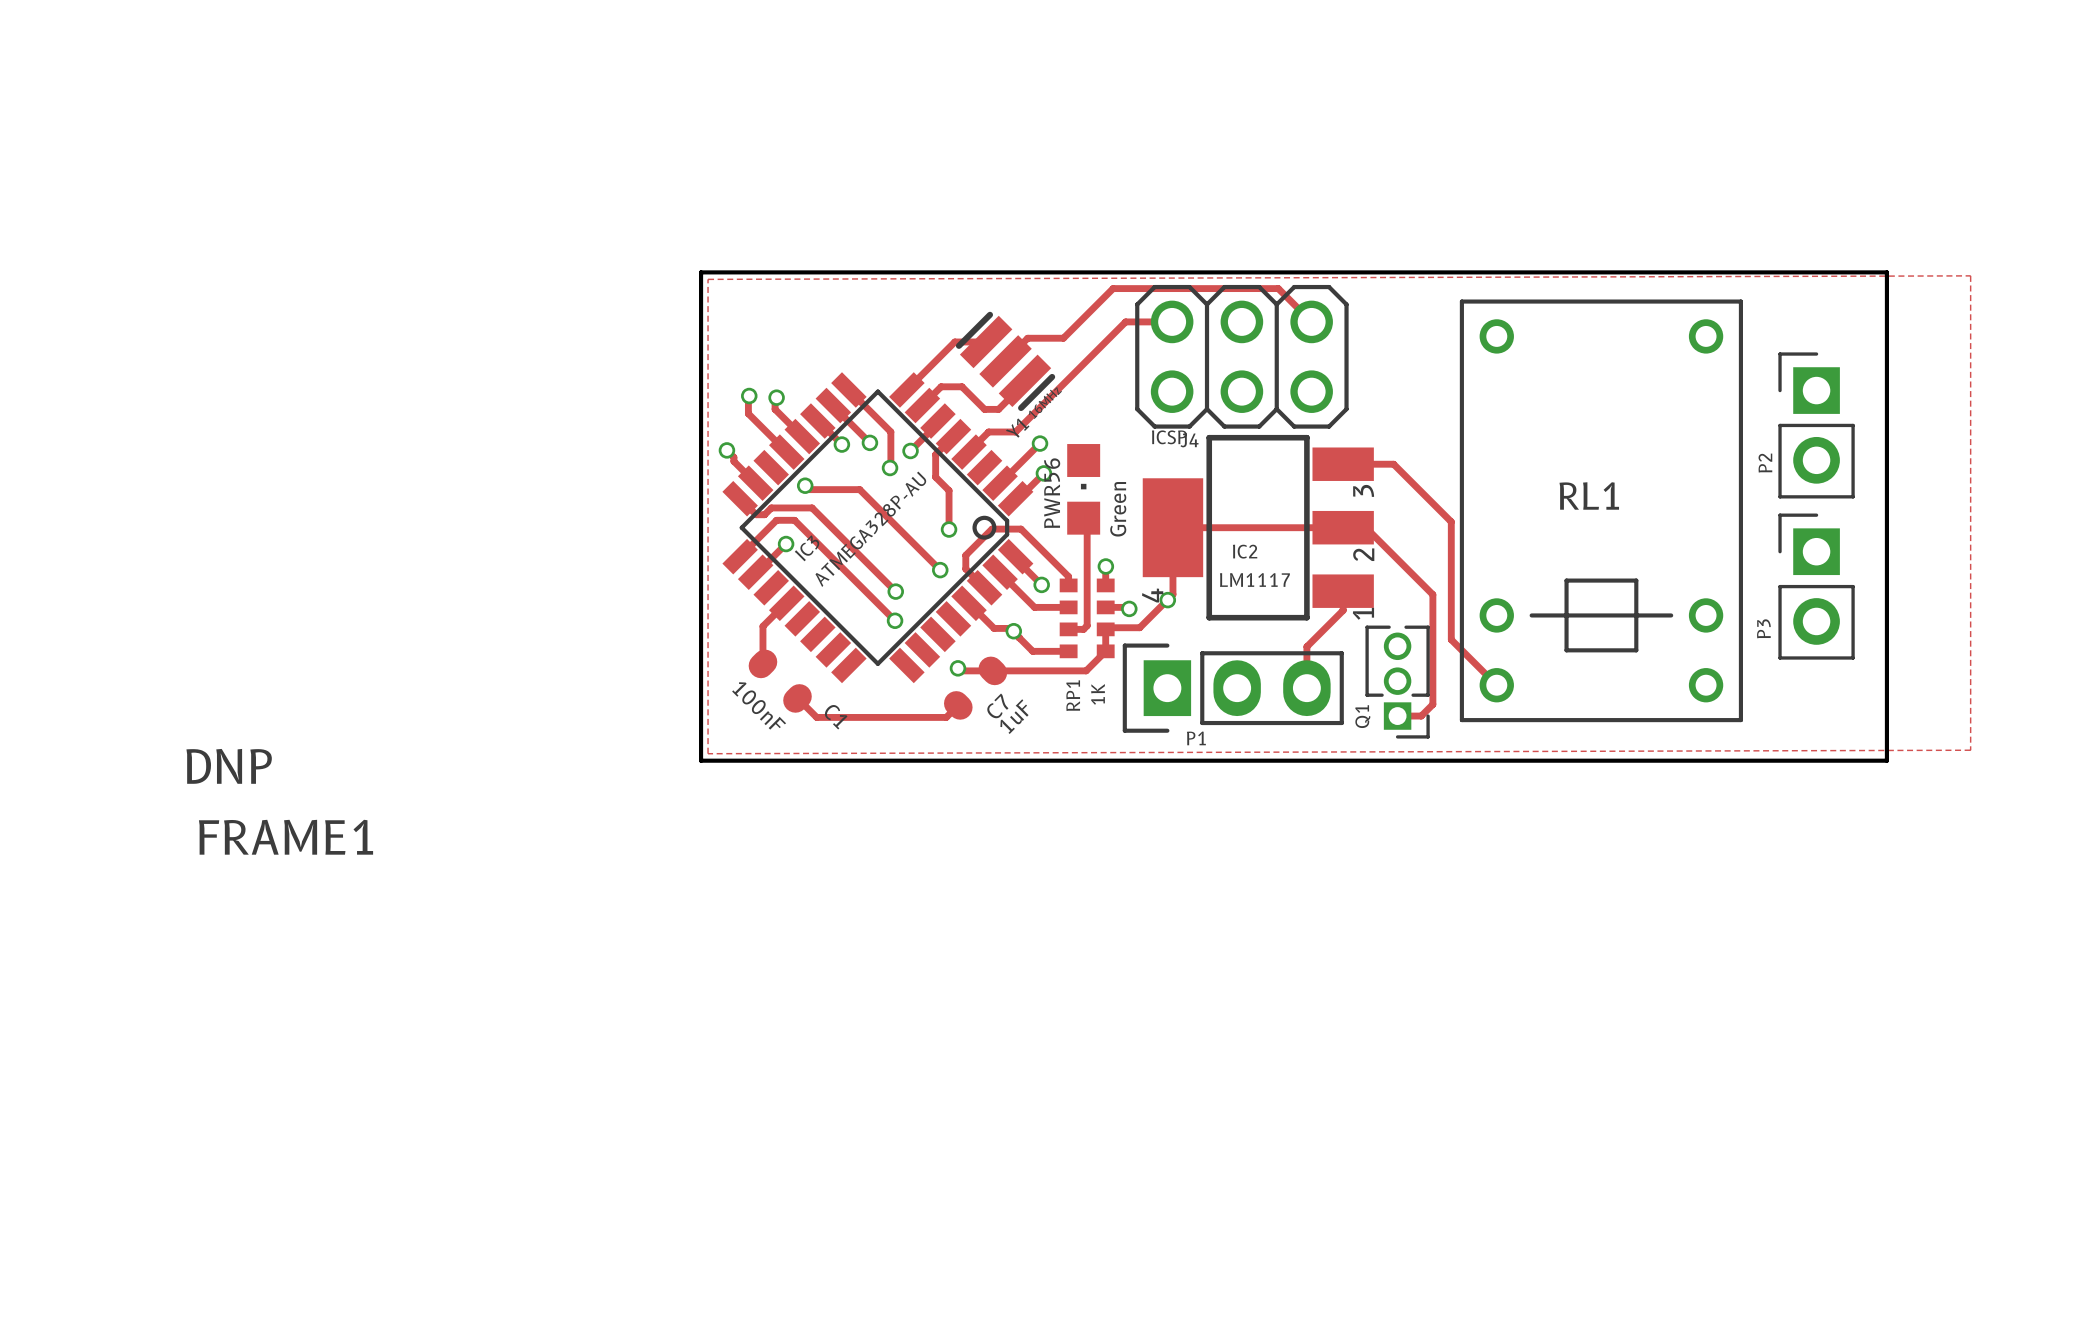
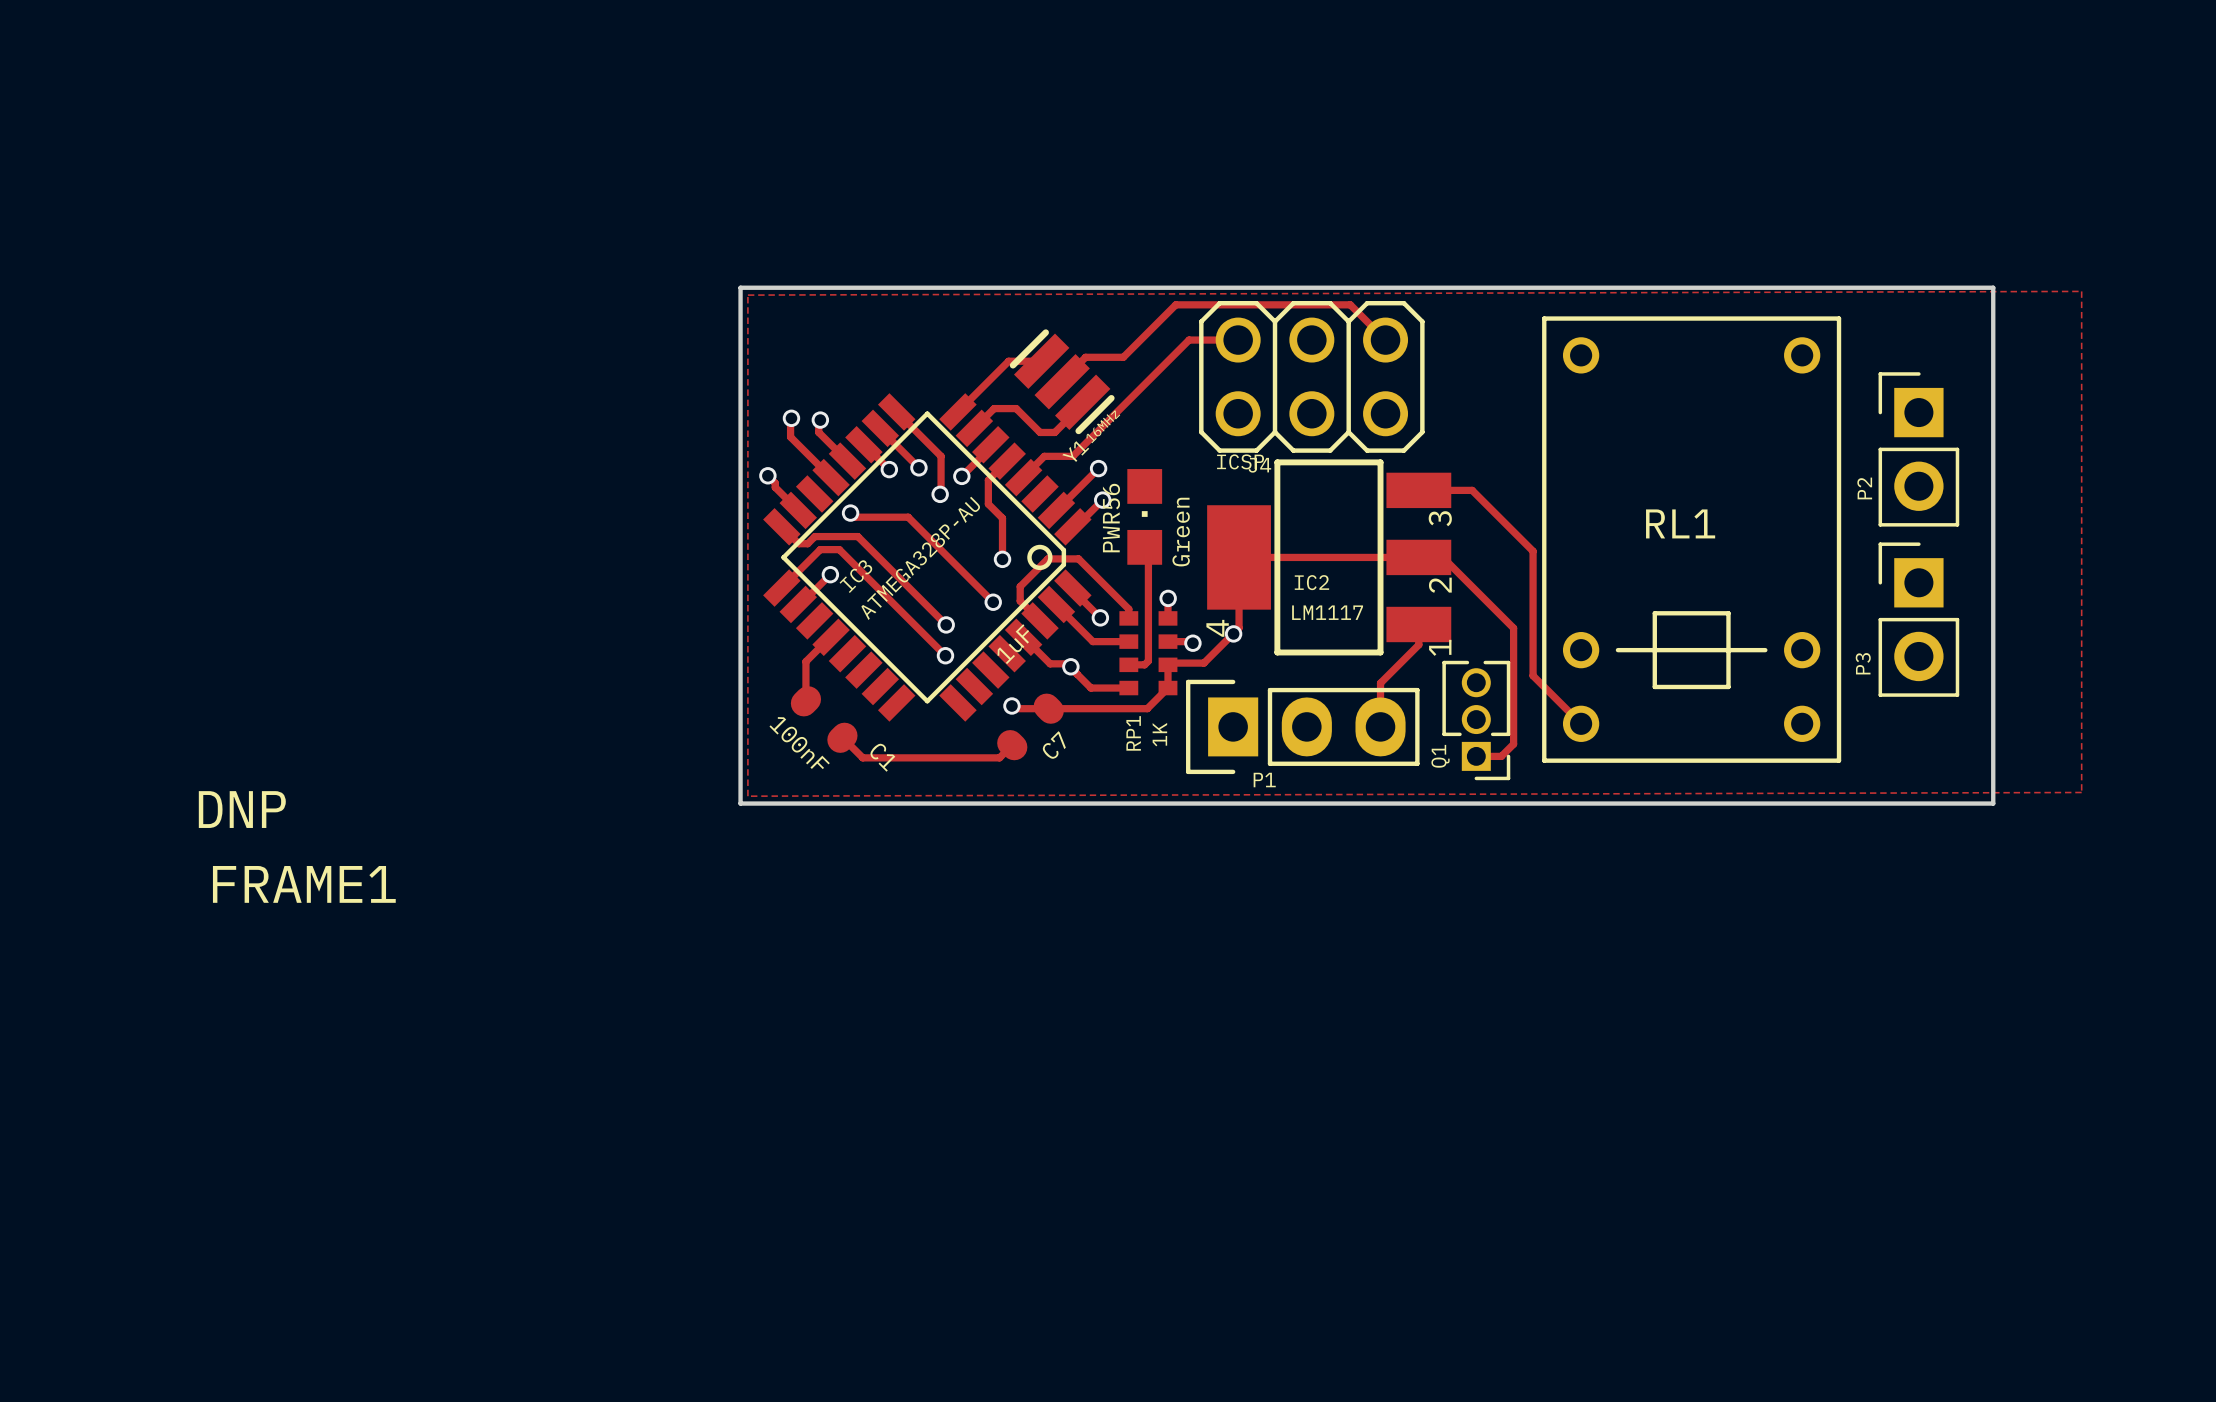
C7 value position: 1uF (1014, 716) -> 1uF (1013, 644)

